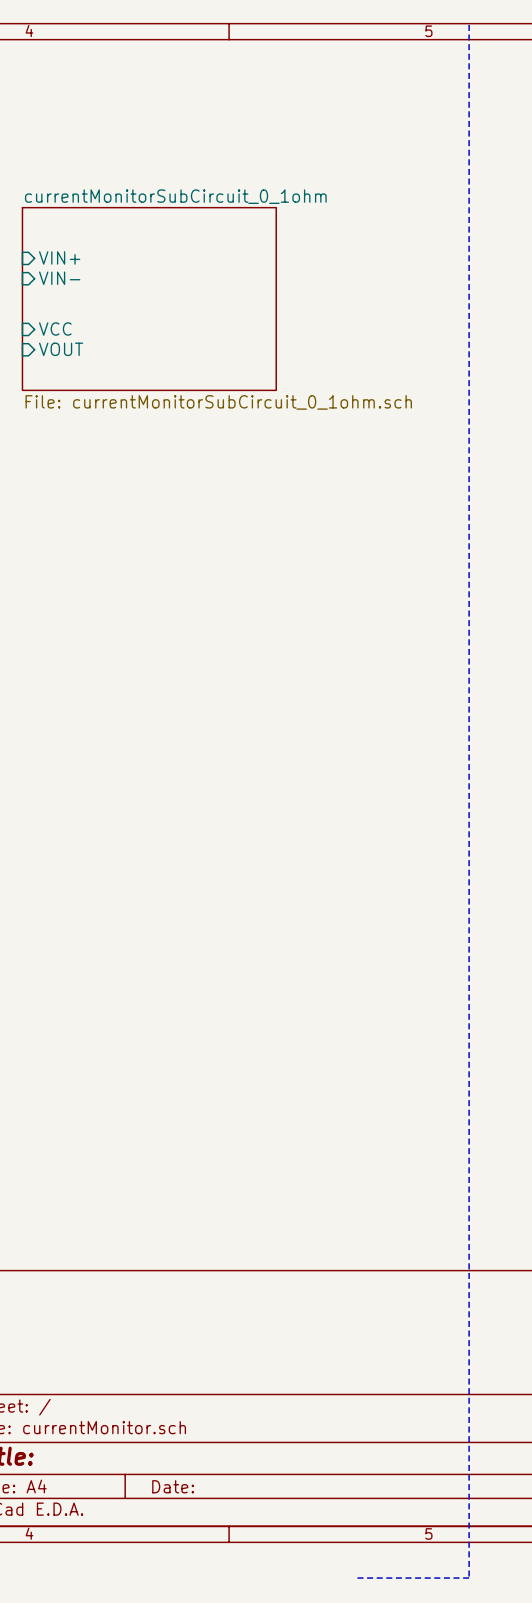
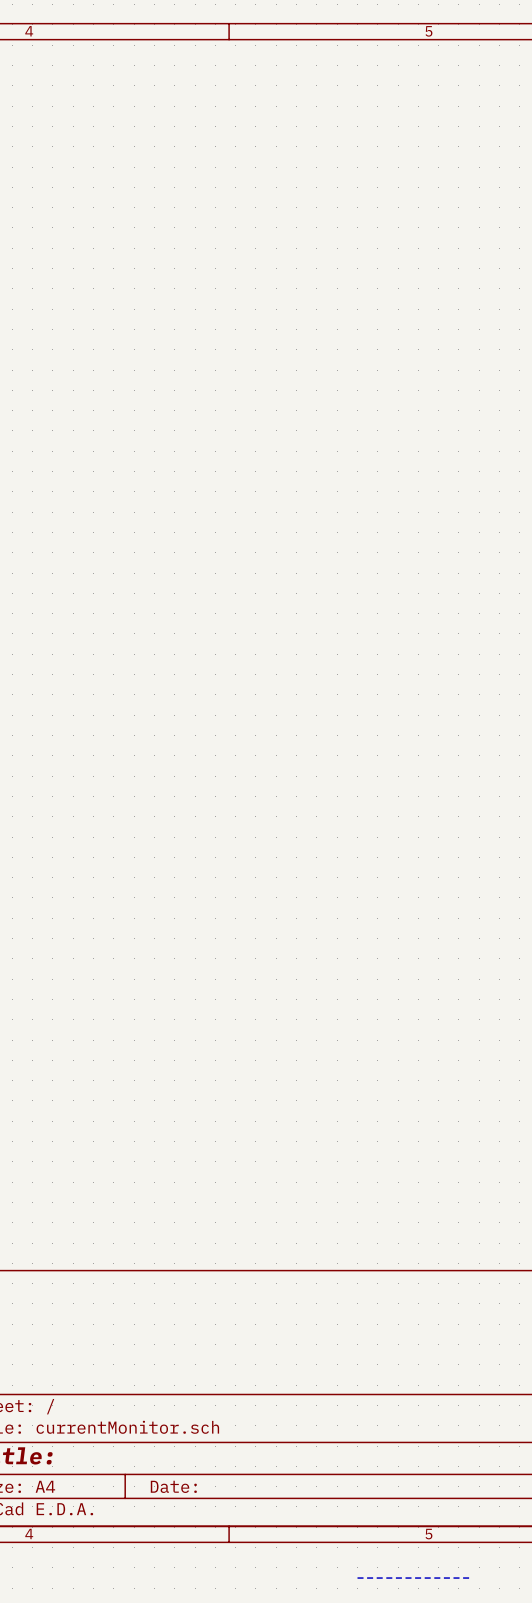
line: (469, 24) (469, 1578) -> none
sheet pin: VIN+ (59, 257) -> none
sheet pin: VIN- (59, 278) -> none
sheet currentMonitorSubCircuit_0_1ohm: File: currentMonitorSubCircuit_0_1ohm.sch (149, 299) -> none
sheet pin: VCC (55, 329) -> none
sheet pin: VOUT (61, 349) -> none

